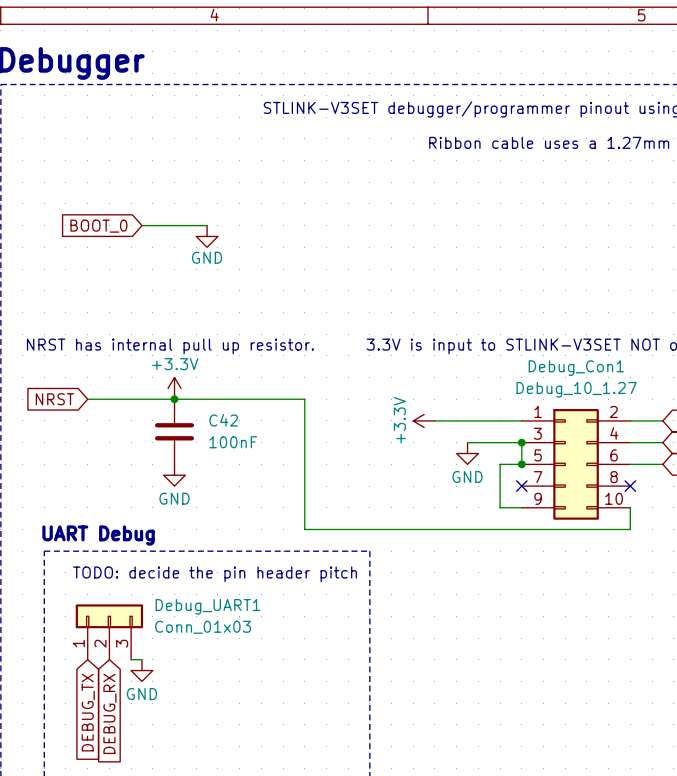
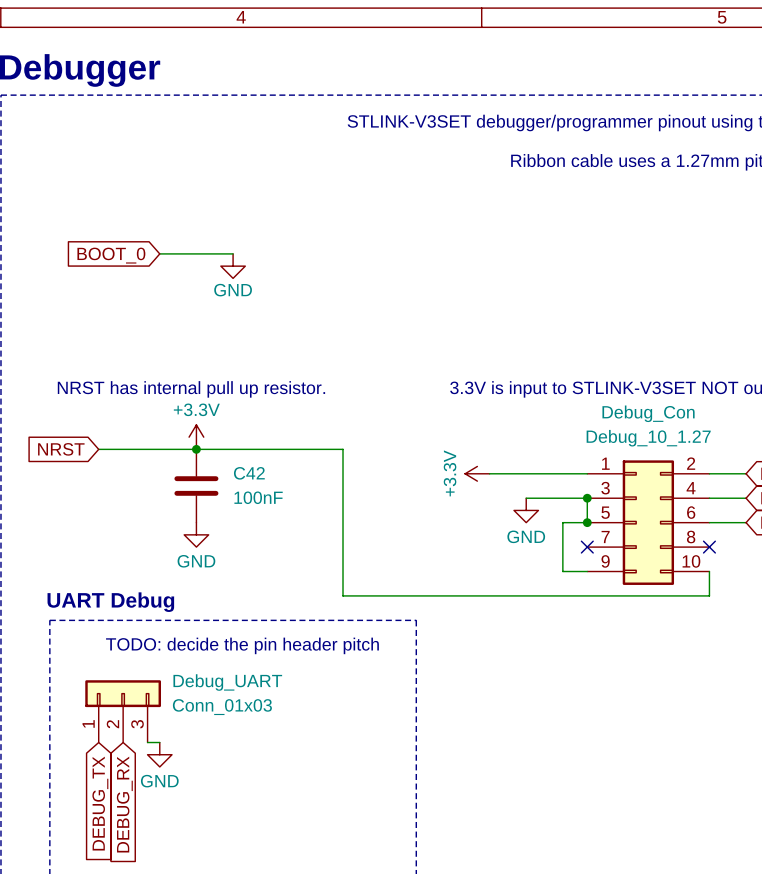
Debug_Con1 name: Debug_Con1 (576, 368) -> Debug_Con (648, 413)
Debug_UART1 name: Debug_UART1 (207, 606) -> Debug_UART (227, 682)

